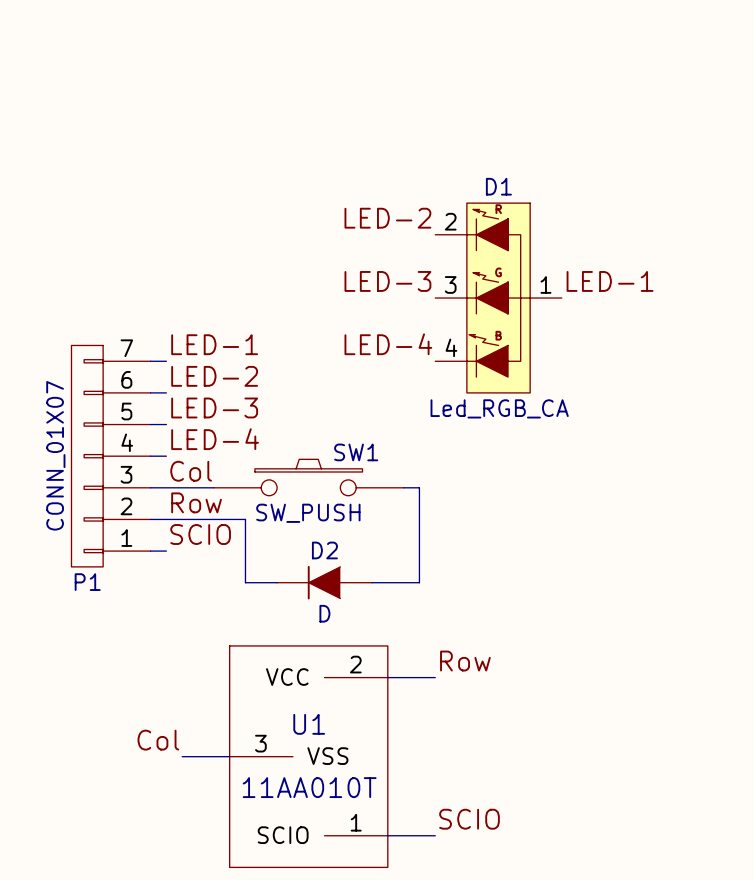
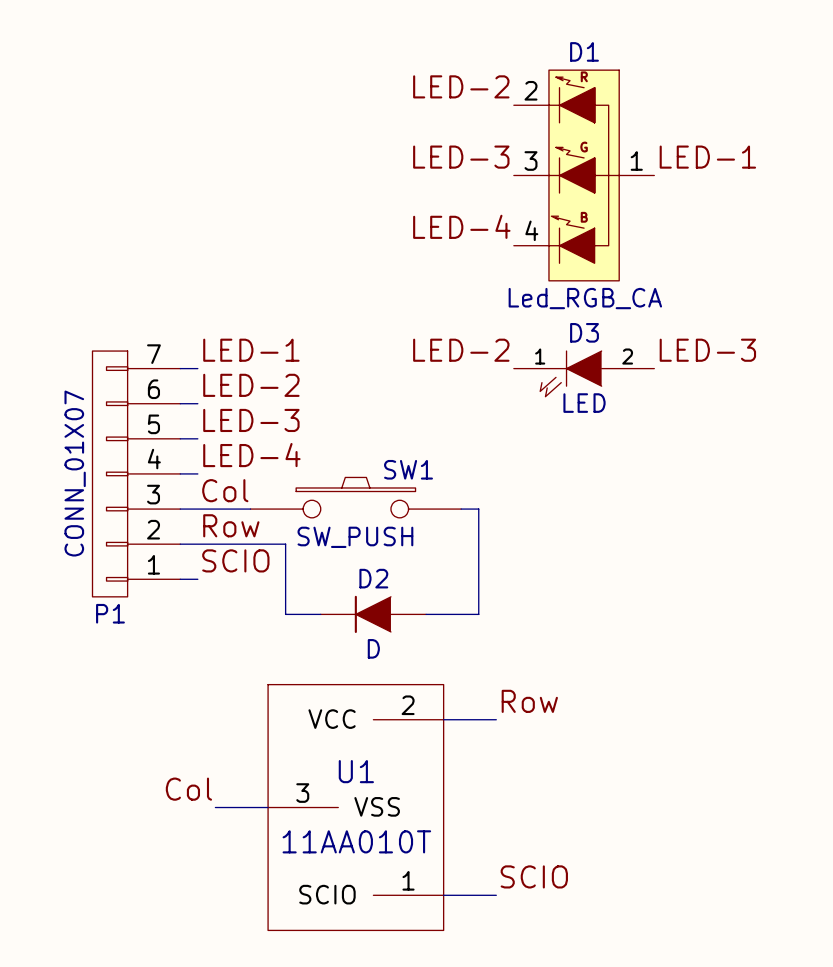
label: none -> LED-2 (461, 86)
label: none -> LED-3 (461, 157)
label: LED-2 (387, 218) -> none
label: LED-3 (387, 281) -> none
label position: LED-1 (610, 281) -> LED-1 (707, 157)
D1 position: (498, 298) -> (584, 175)
label position: LED-4 (388, 344) -> LED-4 (461, 226)
label: none -> LED-2 (461, 350)
label: none -> LED-3 (707, 350)
D3: none -> LED (584, 373)

